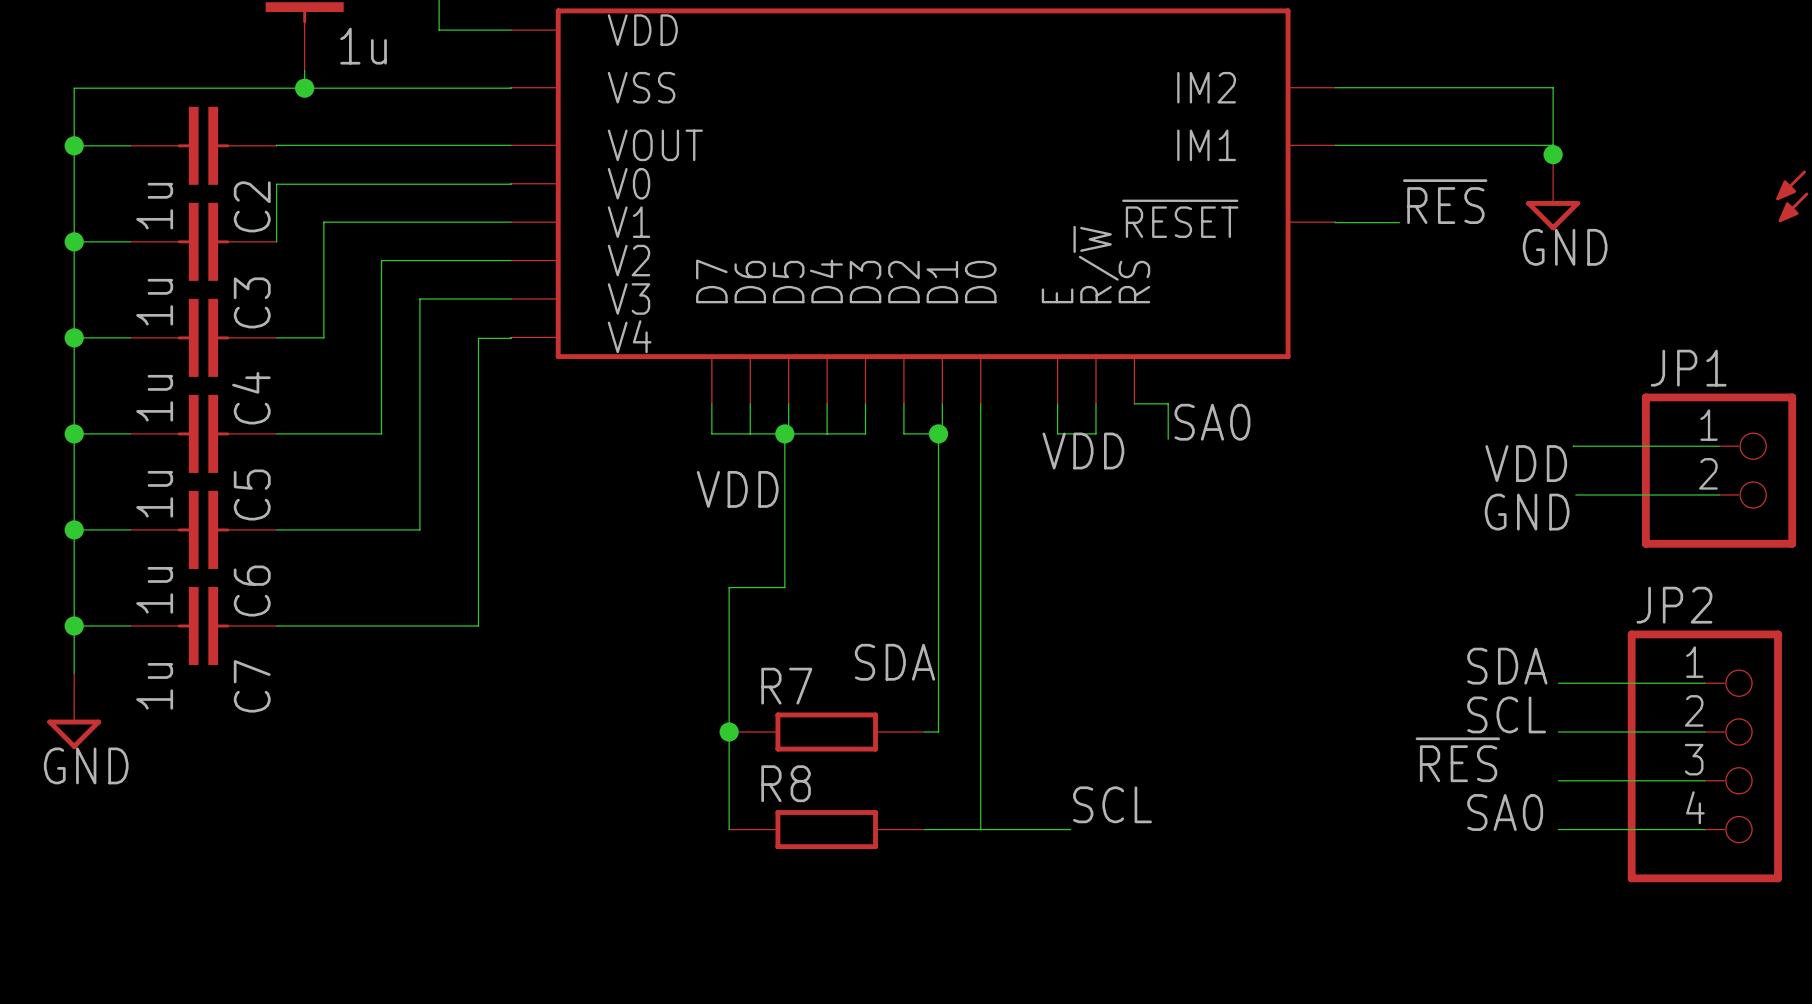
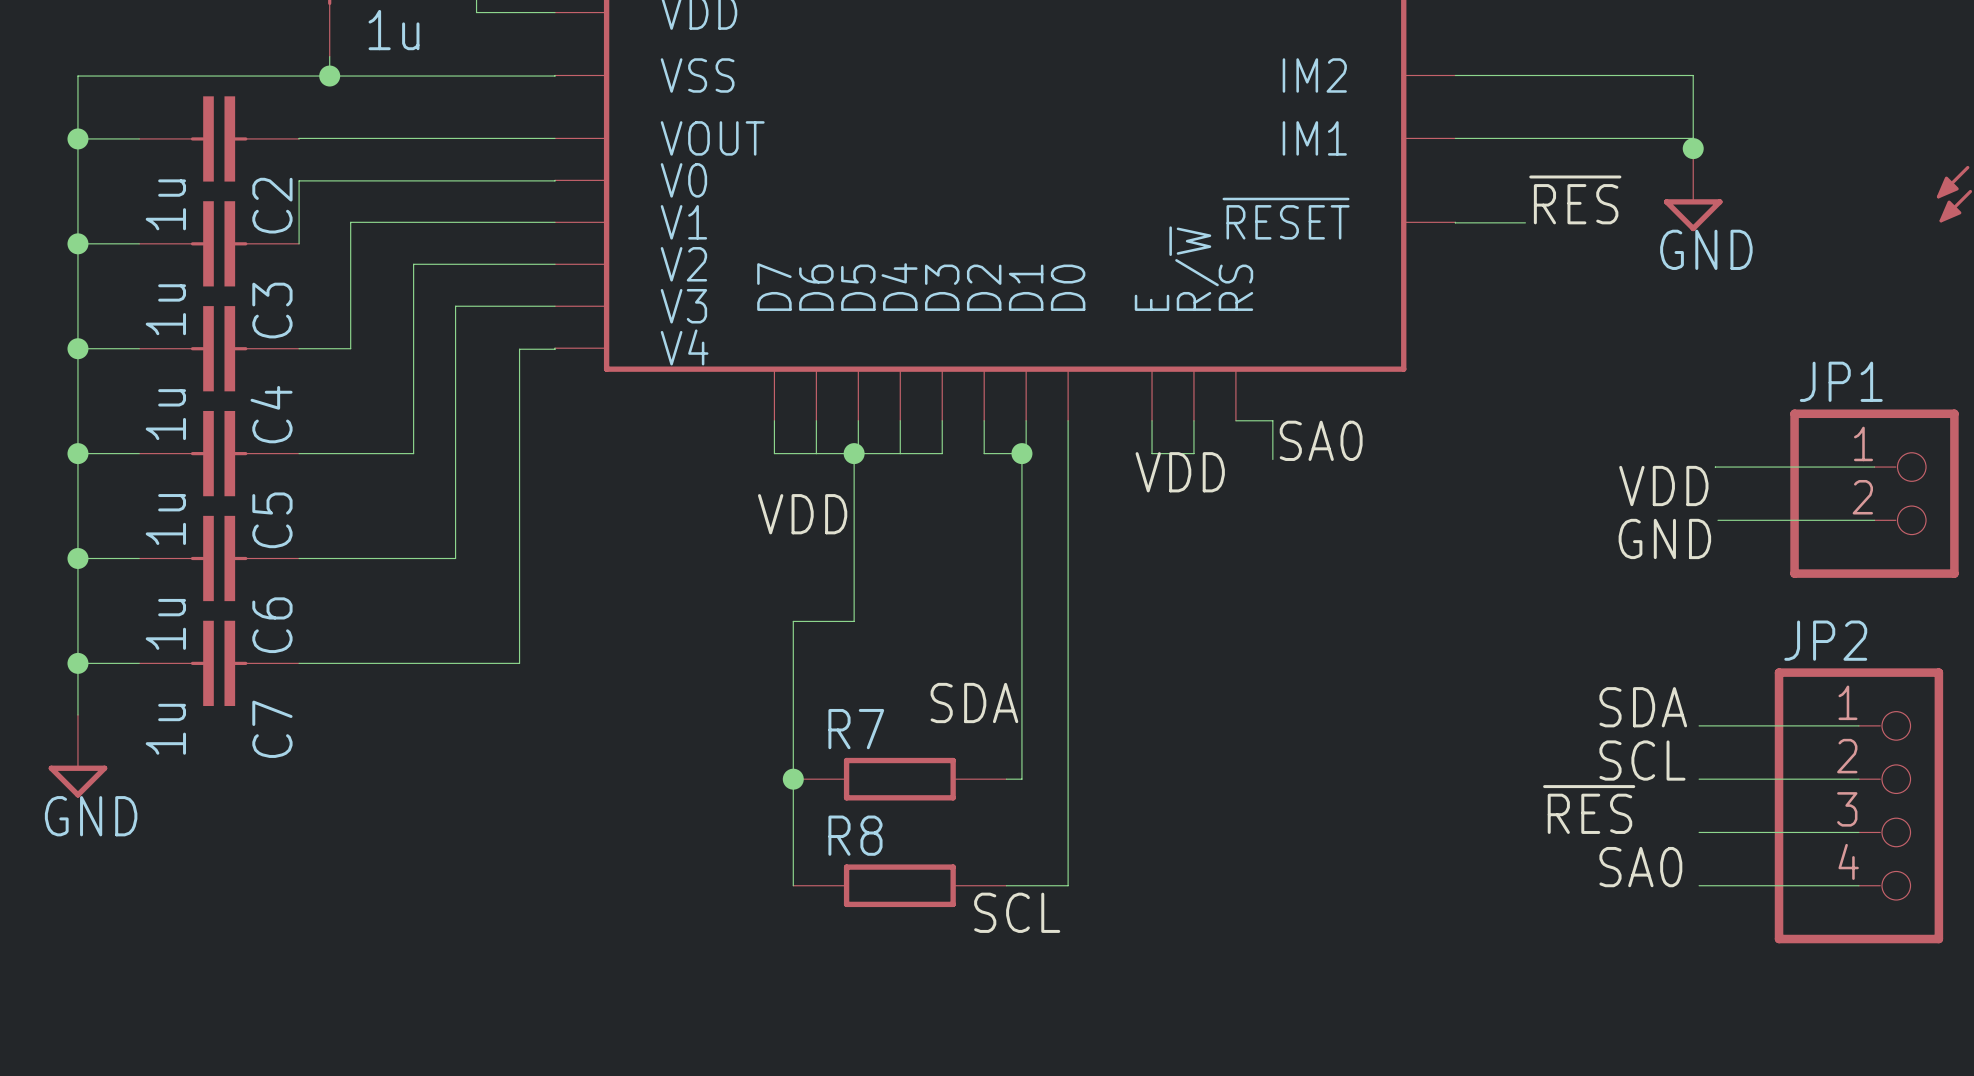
label position: SCL (1112, 804) -> SCL (1017, 912)
wire: (980, 829) (1070, 829) -> none

